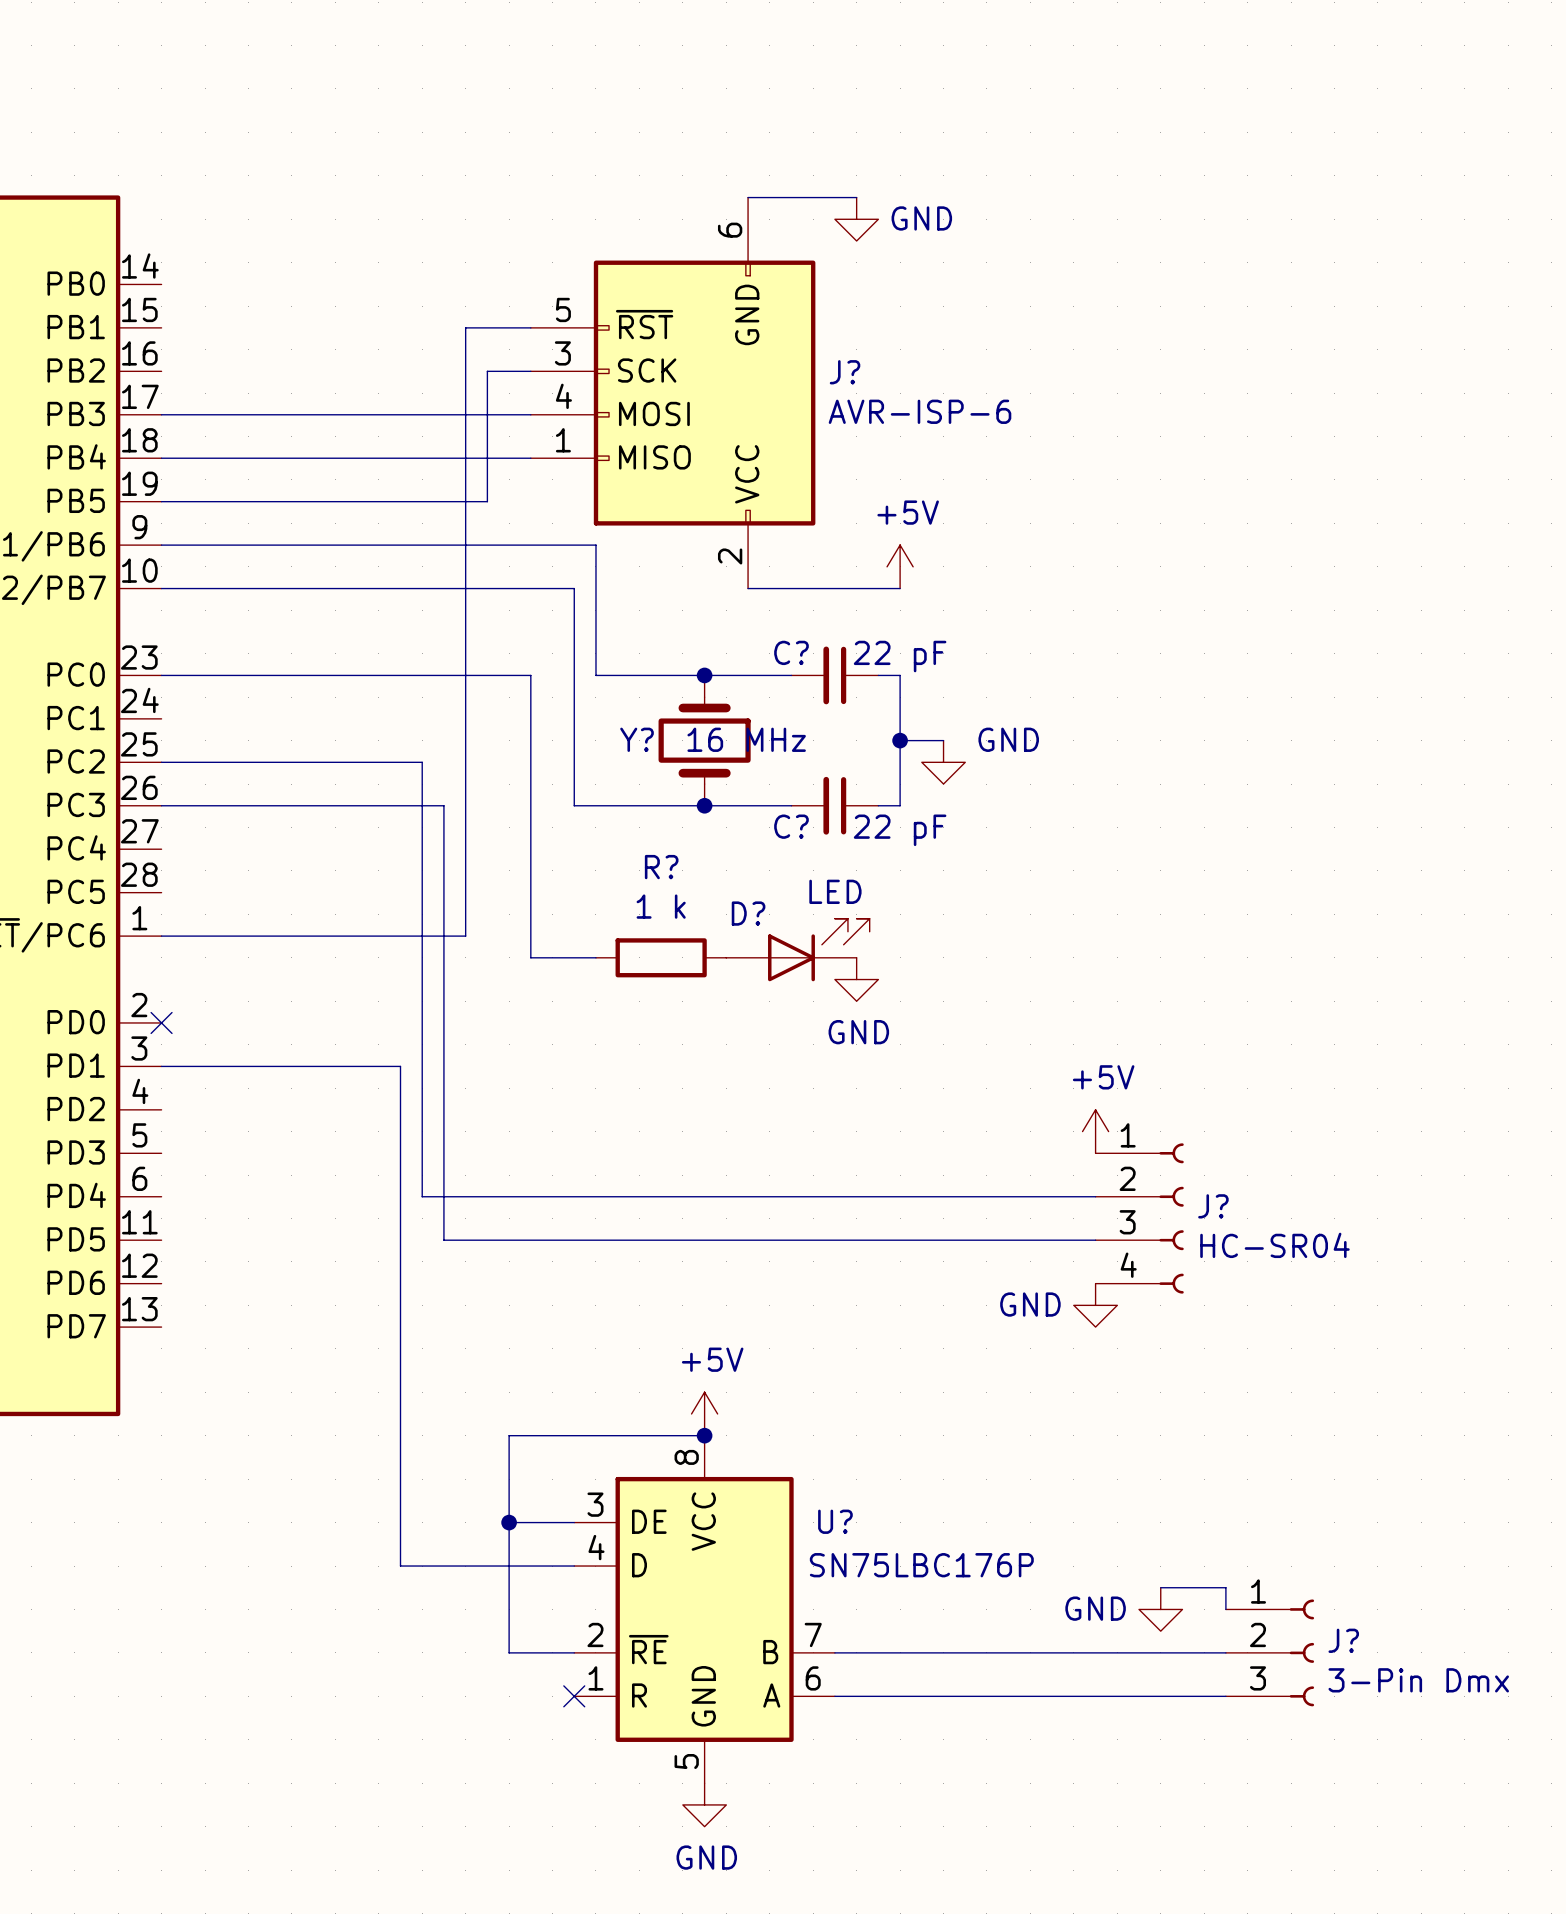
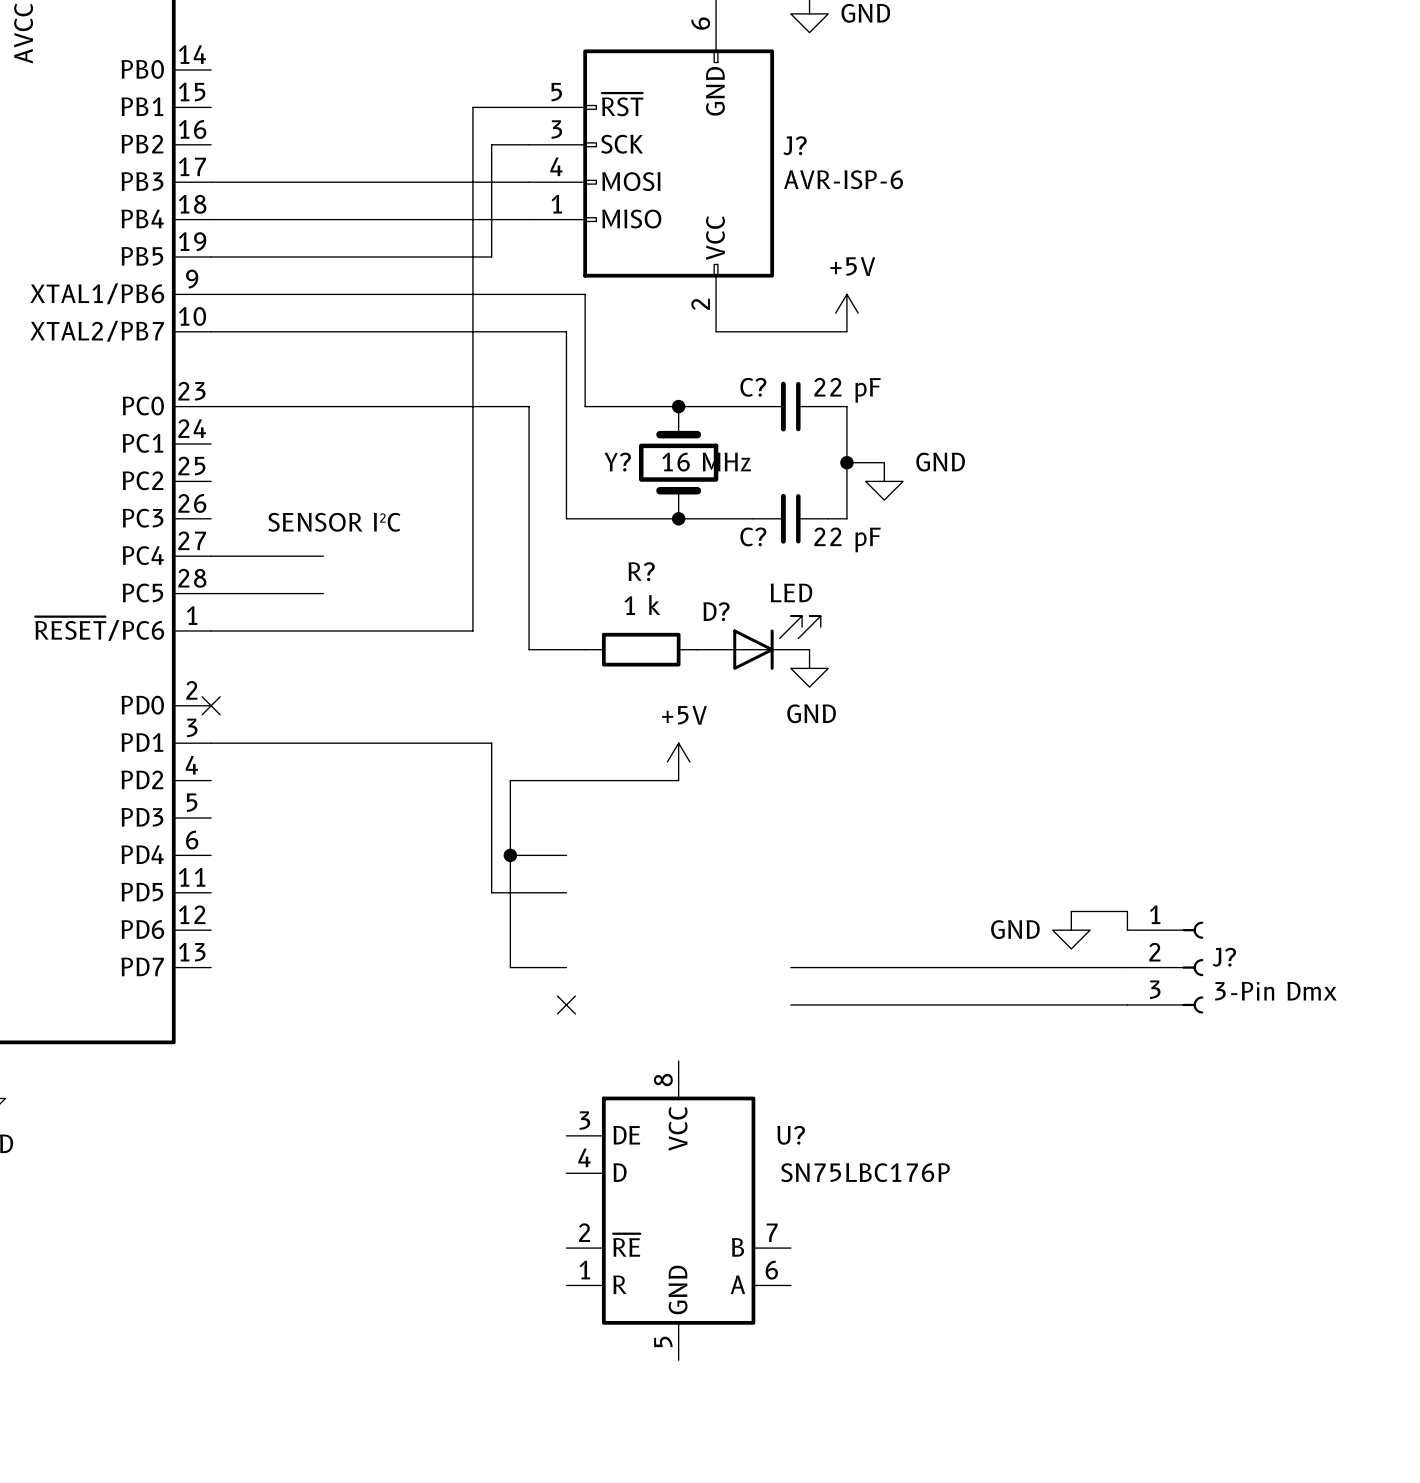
wire: (161, 762) (422, 762) (422, 1196) (509, 1196) -> none
wire: (161, 805) (443, 805) (443, 1240) (487, 1240) -> none
text: none -> SENSOR I²C (334, 522)
wire: none -> (211, 556) (323, 556)
wire: none -> (211, 593) (323, 593)
wire: (400, 1066) (400, 1566) (574, 1566) -> (416, 743) (491, 743) (491, 892)
power symbol: none -> +5V (678, 761)
power symbol: +5V (1095, 1131) -> none
junction: none -> (510, 855)
wire: (574, 1196) (1095, 1196) -> none
J?: HC-SR04 (1139, 1218) -> none
wire: (574, 1240) (1095, 1240) -> none
power symbol position: GND (1095, 1305) -> GND (1071, 930)
no-connect mark: none -> (566, 1004)
power symbol: +5V (704, 1413) -> none
wire: (704, 1435) (509, 1435) (509, 1652) (574, 1652) -> (678, 780) (510, 780) (510, 967) (566, 967)
junction: (704, 1435) -> none
wire: (509, 1522) (574, 1522) -> none
junction: (509, 1522) -> none
wire: (1160, 1587) (1225, 1587) (1225, 1609) -> (1071, 911) (1127, 911) (1127, 930)
power symbol: GND (1160, 1609) -> none
wire: (834, 1652) (1225, 1652) -> (790, 967) (1127, 967)
J? position: (1270, 1652) -> (1165, 967)
no-connect mark: (574, 1696) -> none
wire: (834, 1696) (1225, 1696) -> (790, 1004) (1127, 1004)
power symbol: GND (704, 1804) -> none

